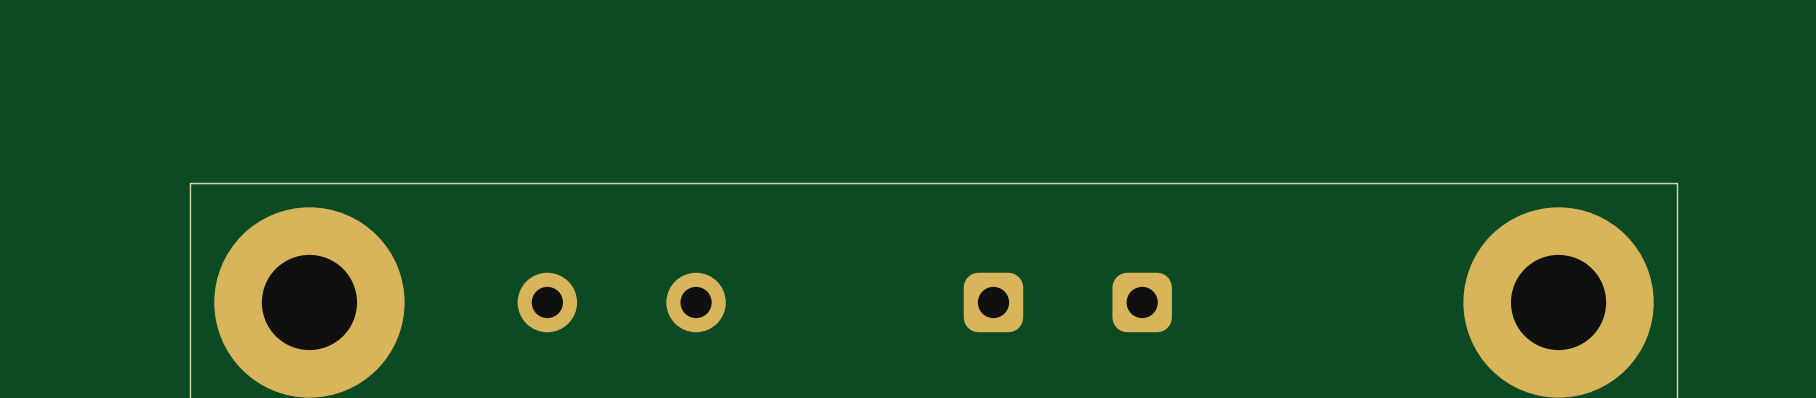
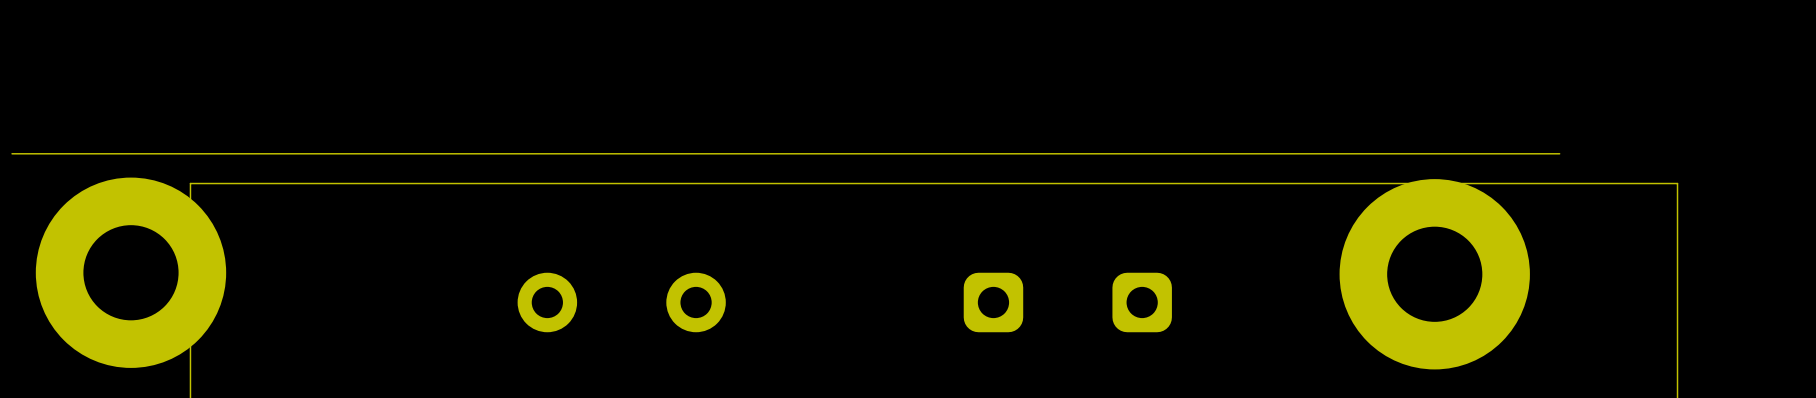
board edge: none -> (1559, 153) (12, 153)
part position: (309, 302) -> (130, 272)
part position: (1558, 302) -> (1434, 274)

